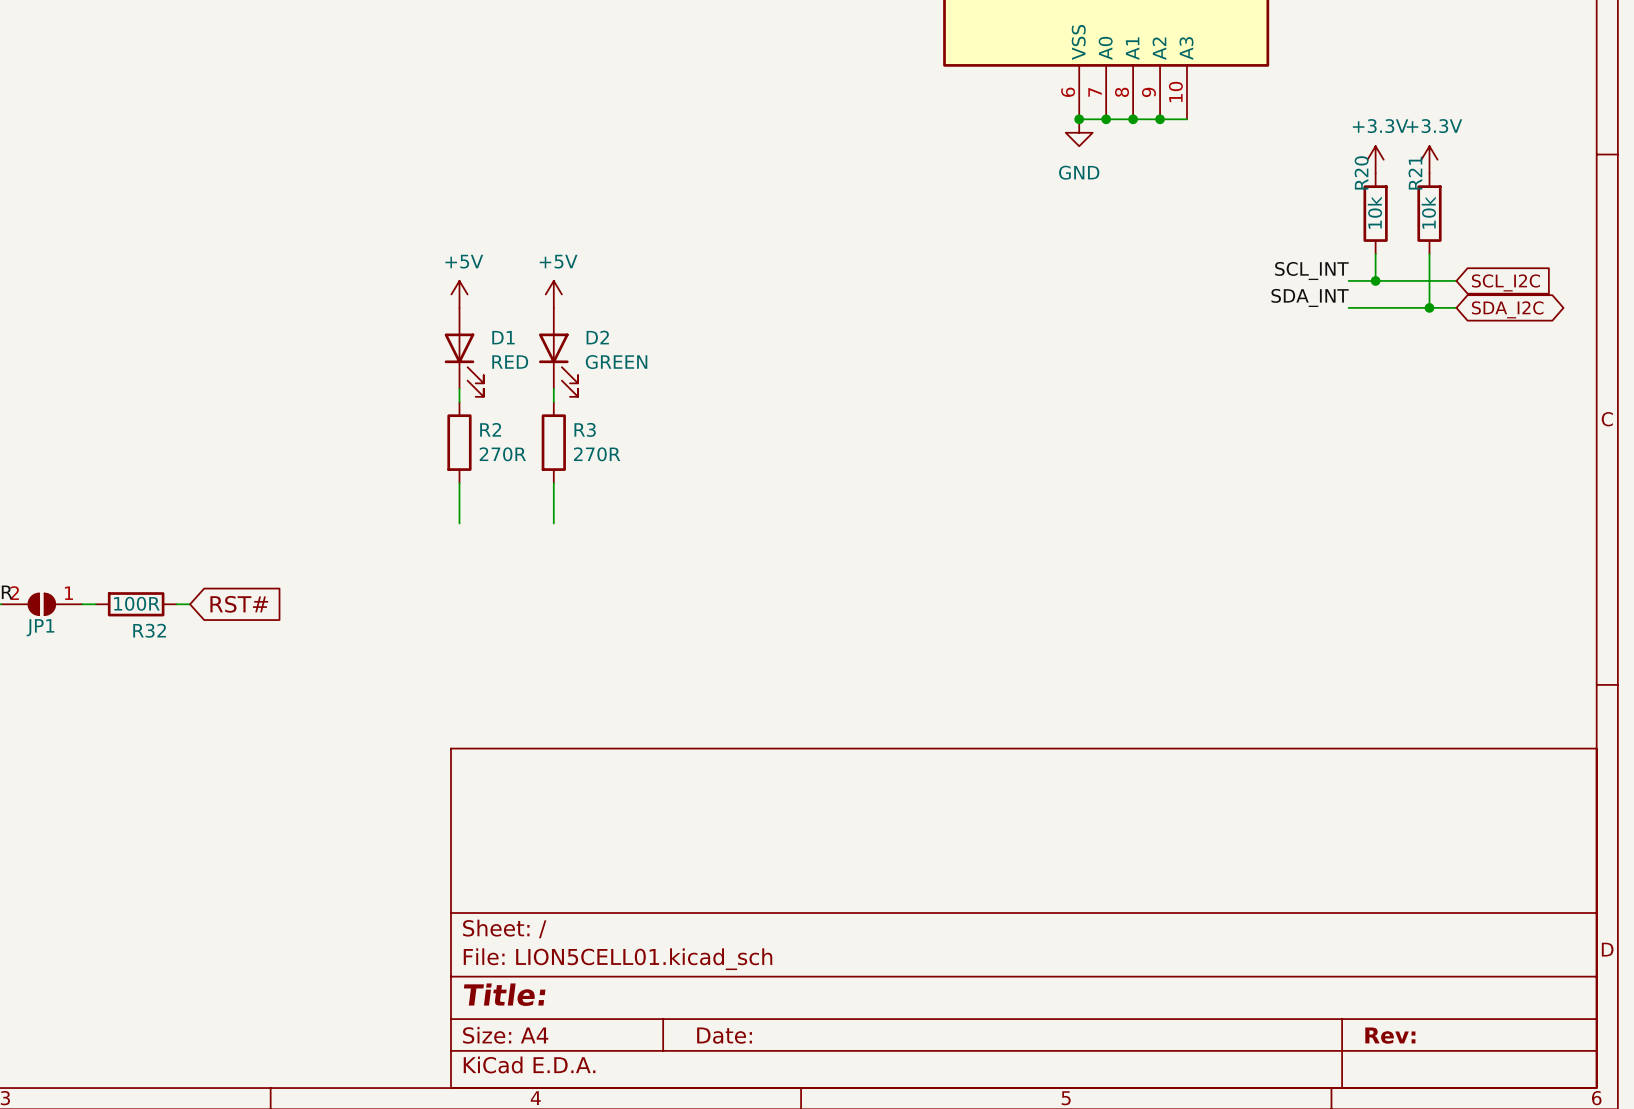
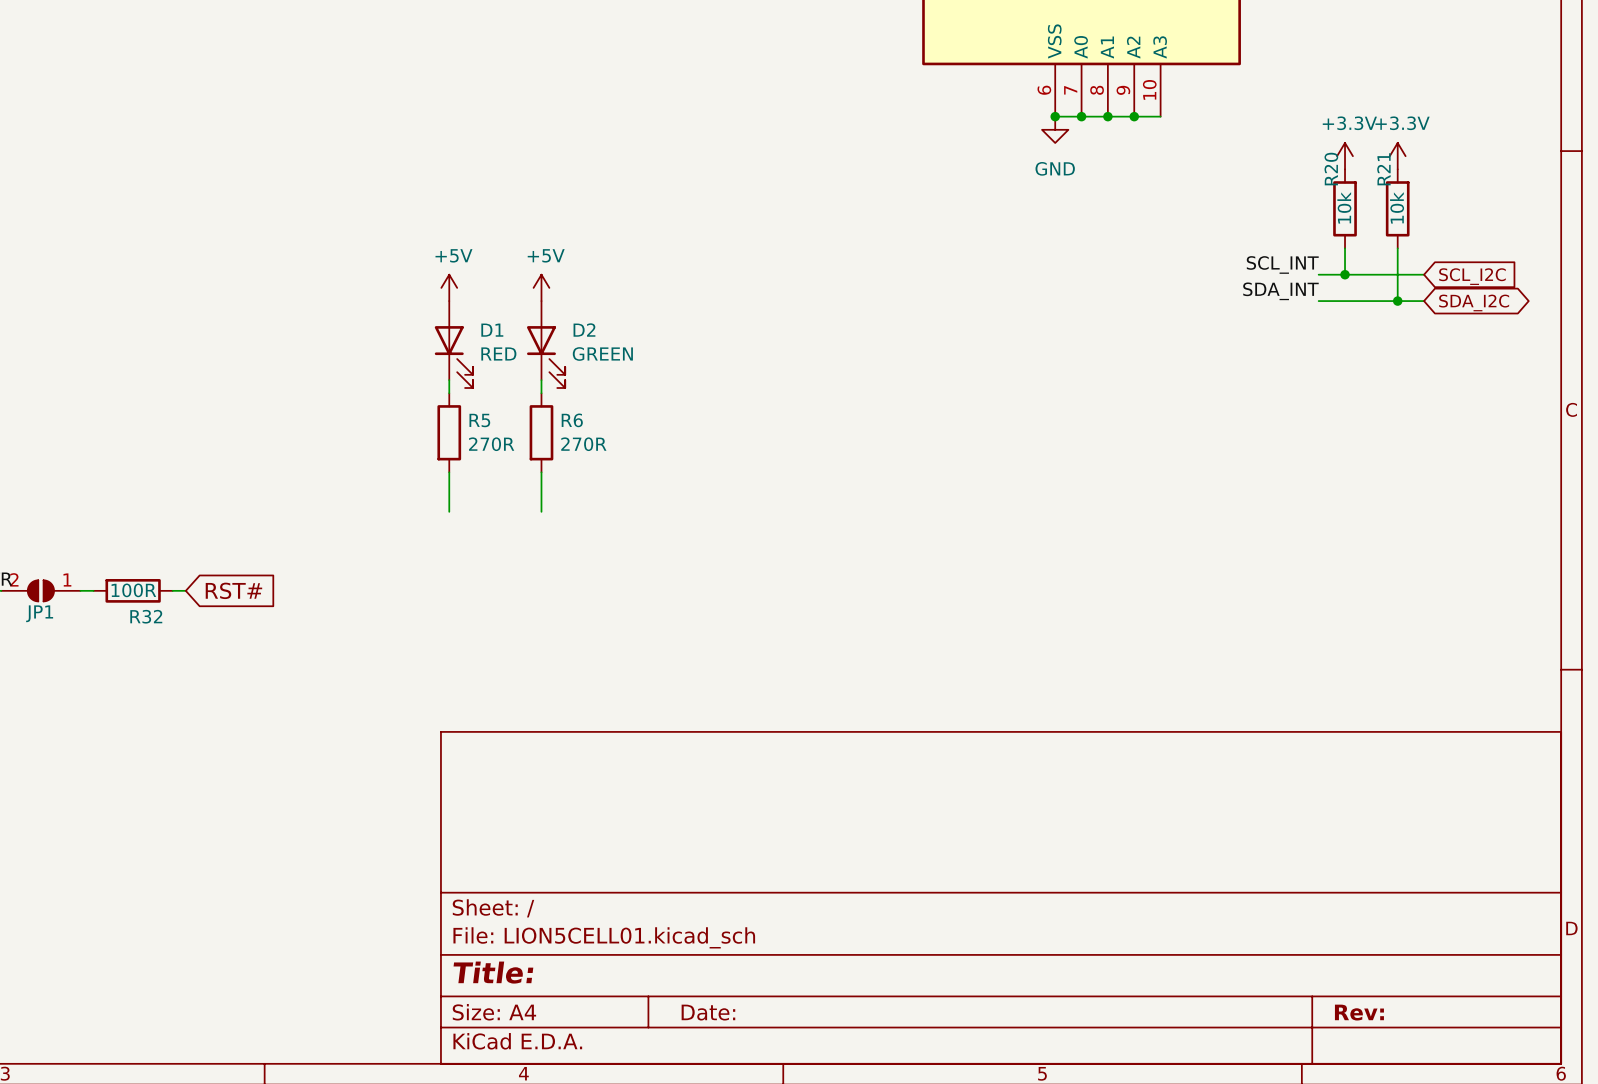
R2 name: R2 (490, 429) -> R5 (479, 420)
R3 name: R3 (585, 429) -> R6 (572, 420)

